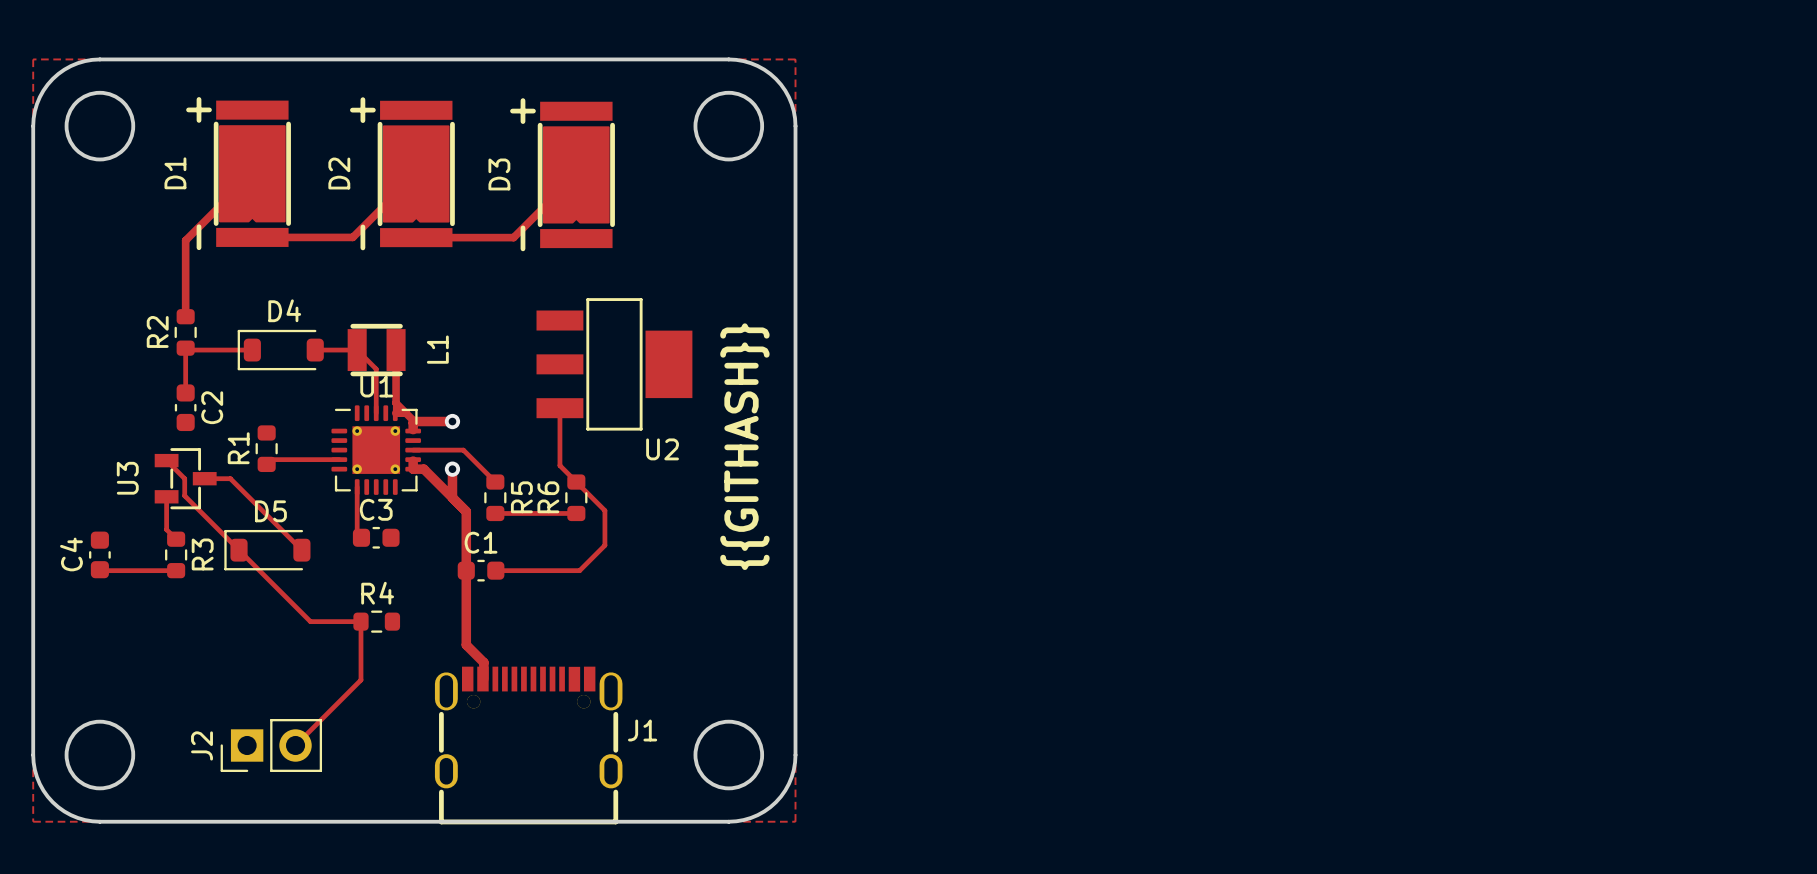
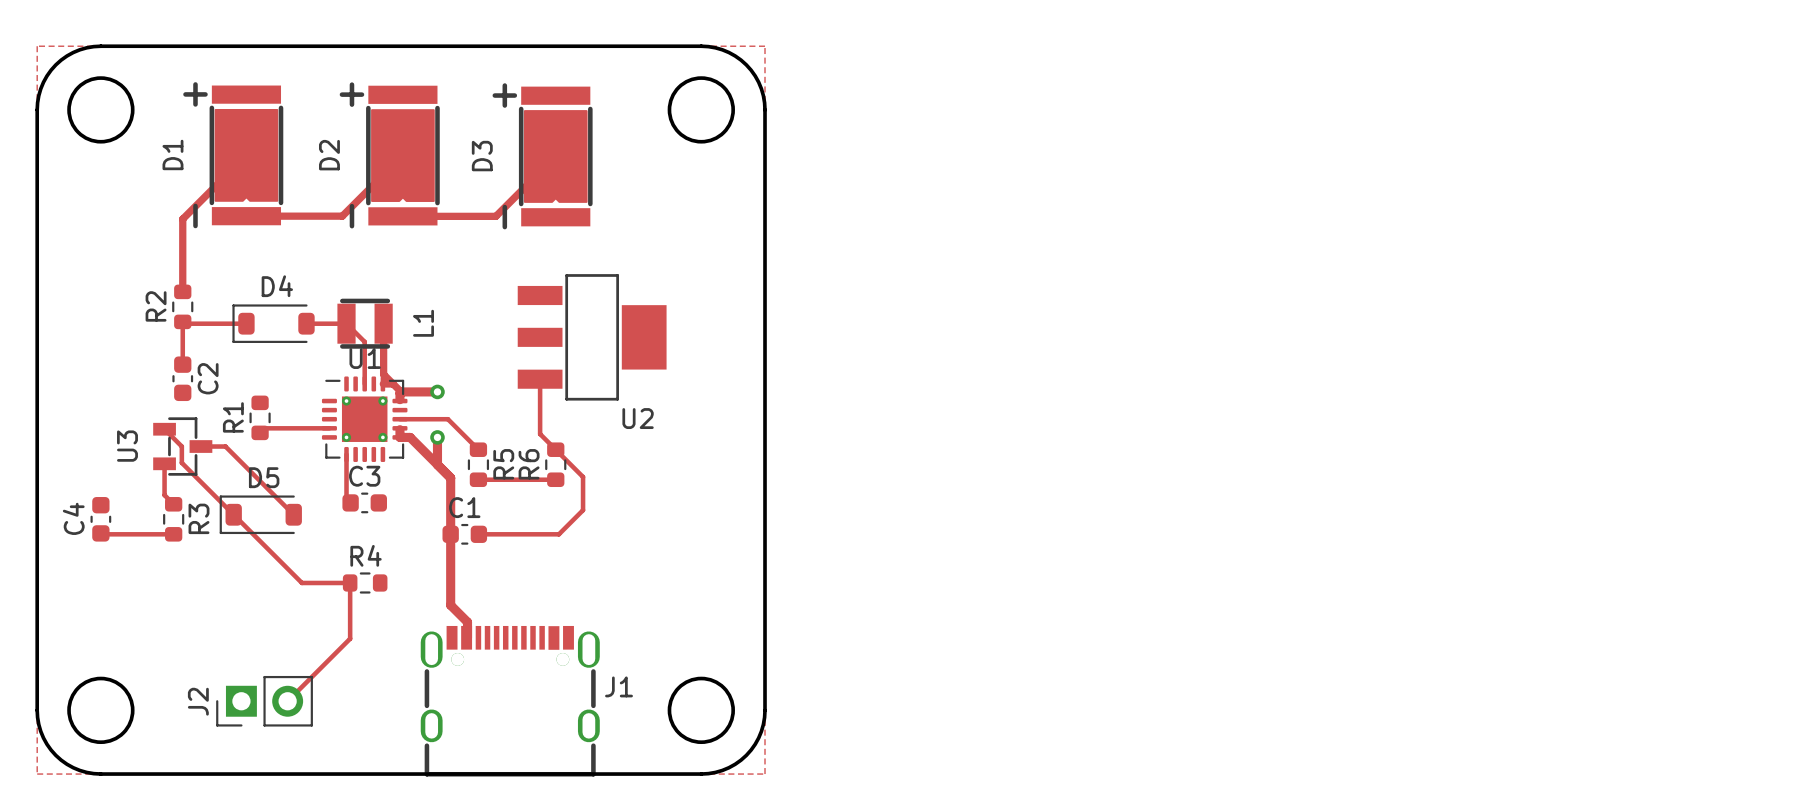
text: {{GITHASH}} (744, 446) -> none

